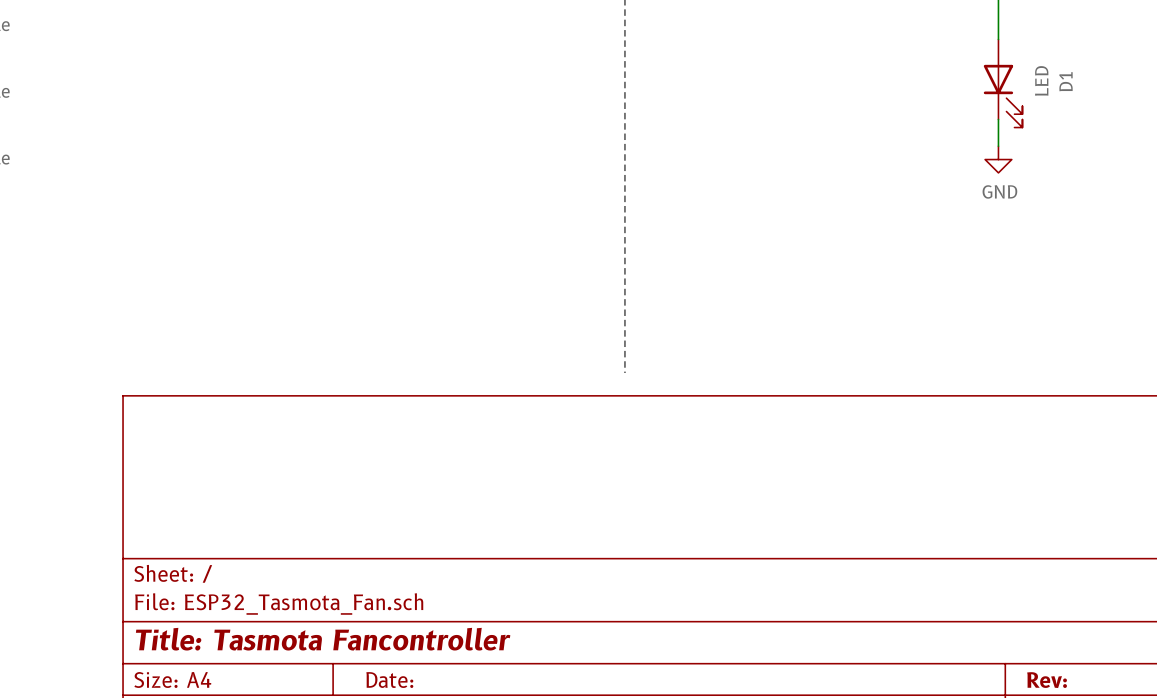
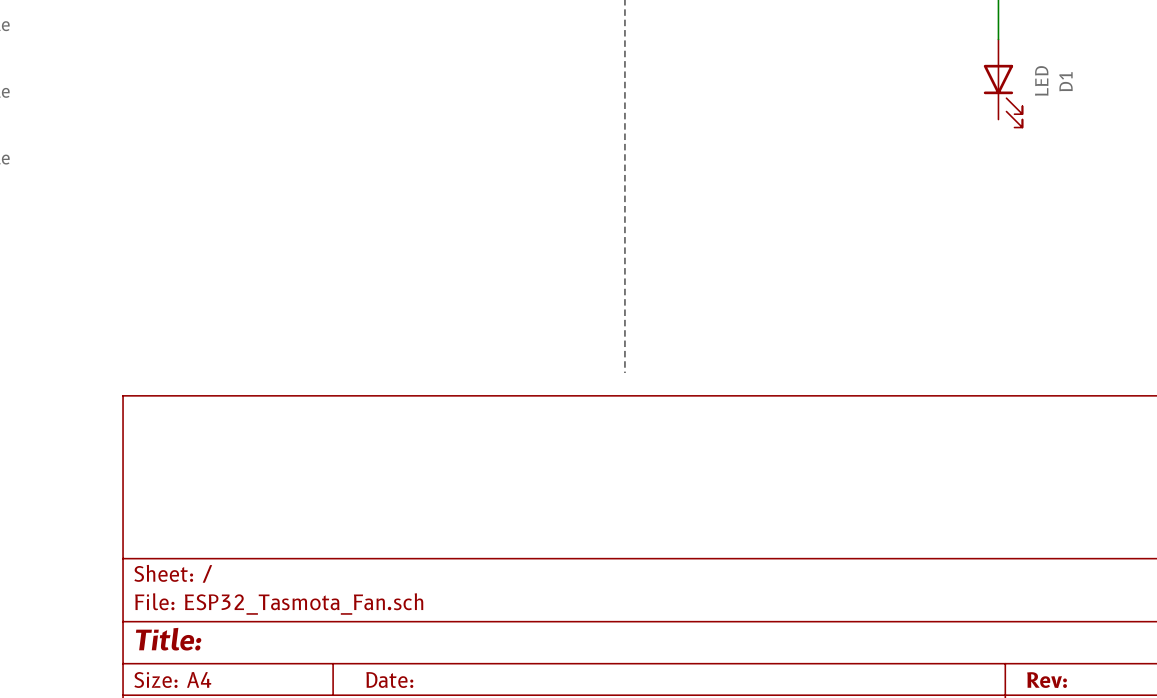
wire: (998, 119) (998, 146) -> none
power symbol: GND (998, 159) -> none
title block: Title: Tasmota Fancontroller (323, 639) -> Title: (168, 639)

